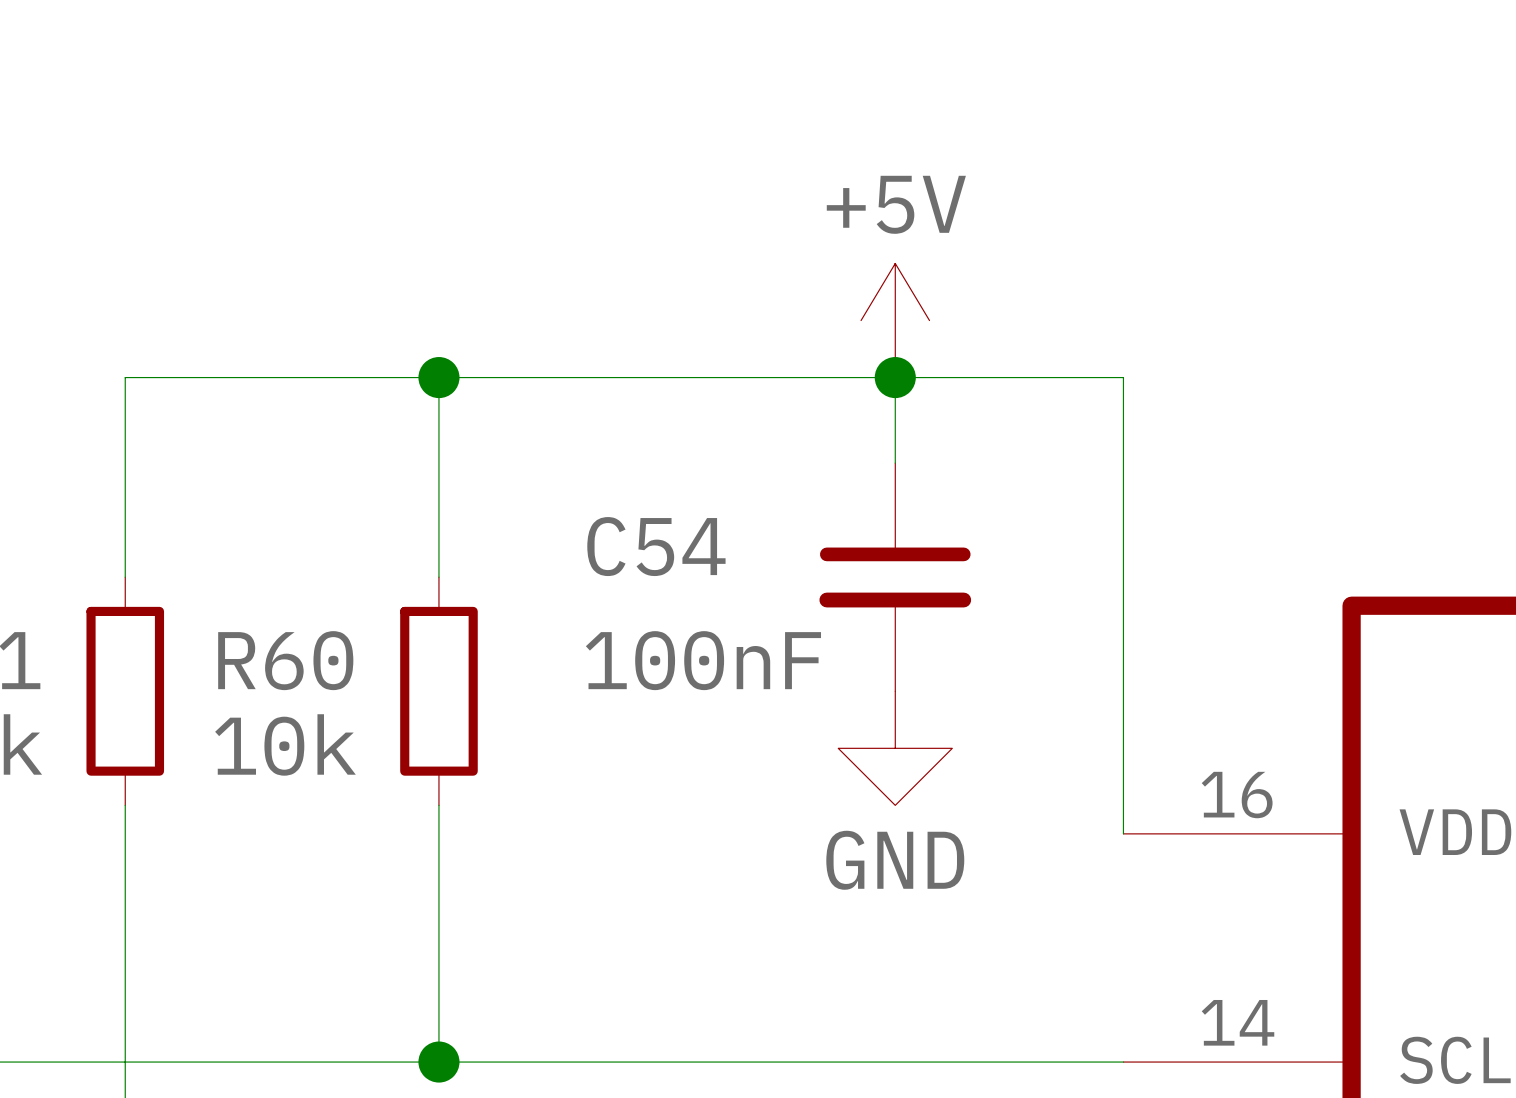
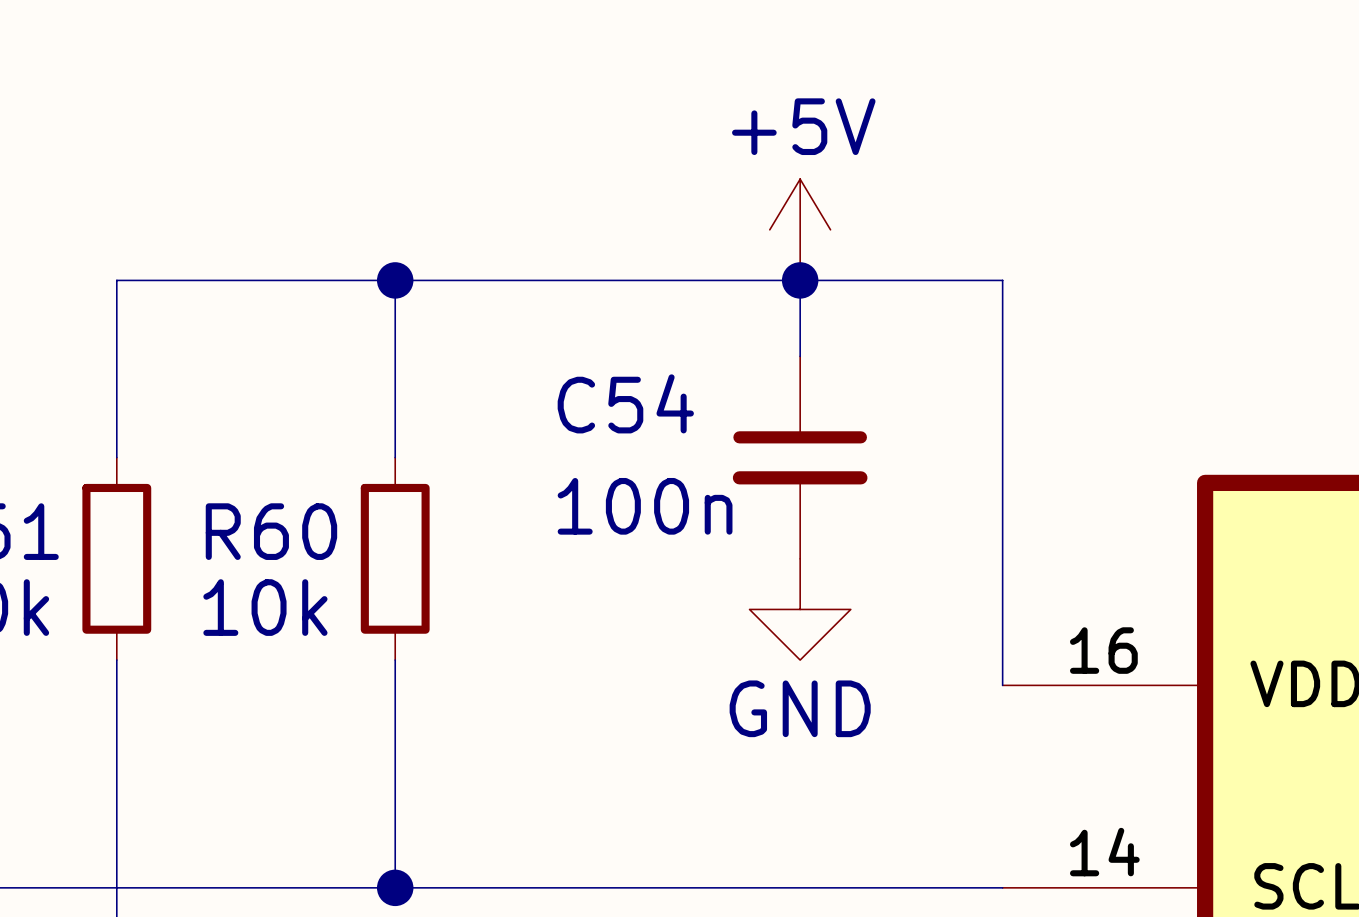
C54 name position: C54 (656, 546) -> C54 (625, 403)
C54 value: 100nF (703, 660) -> 100n (645, 506)

